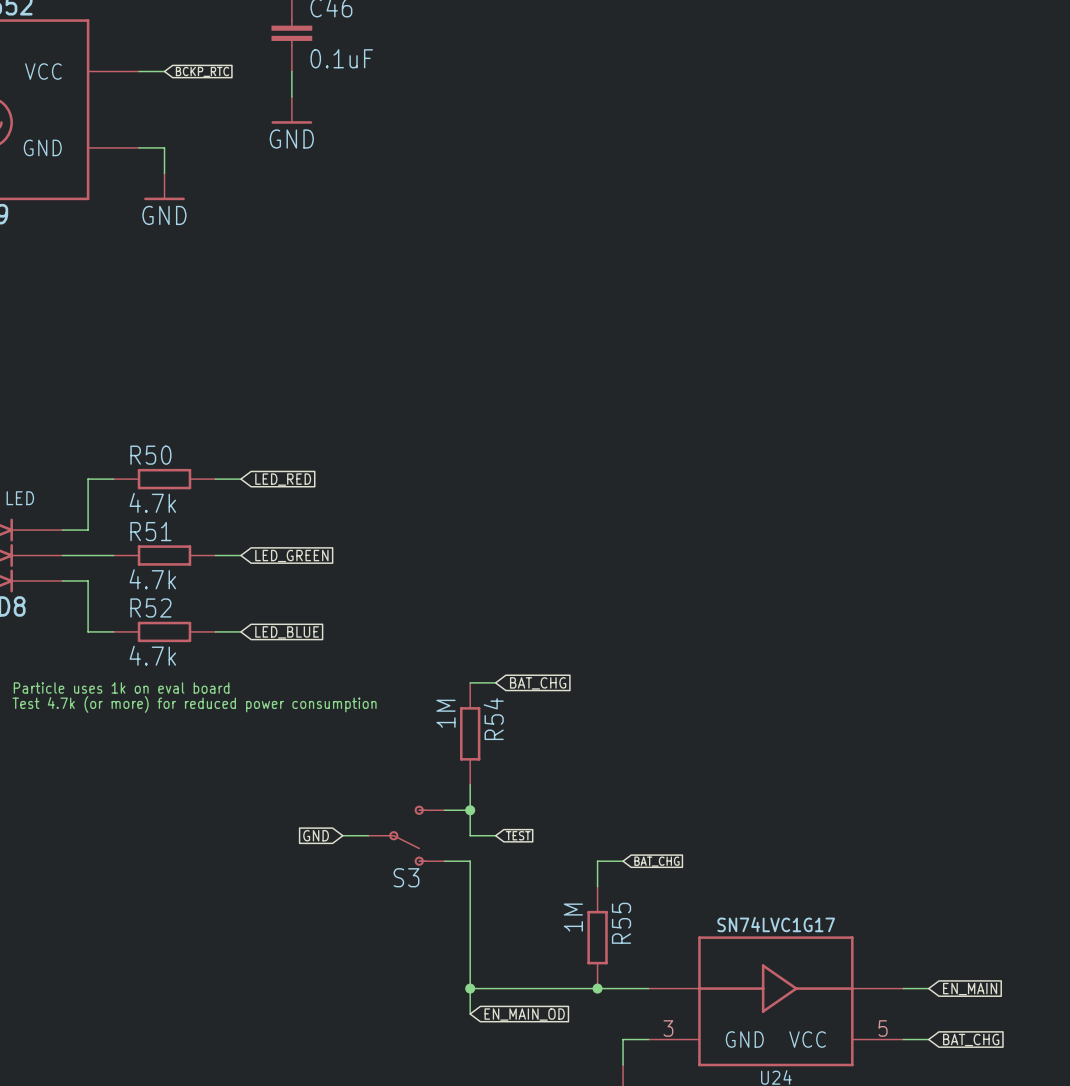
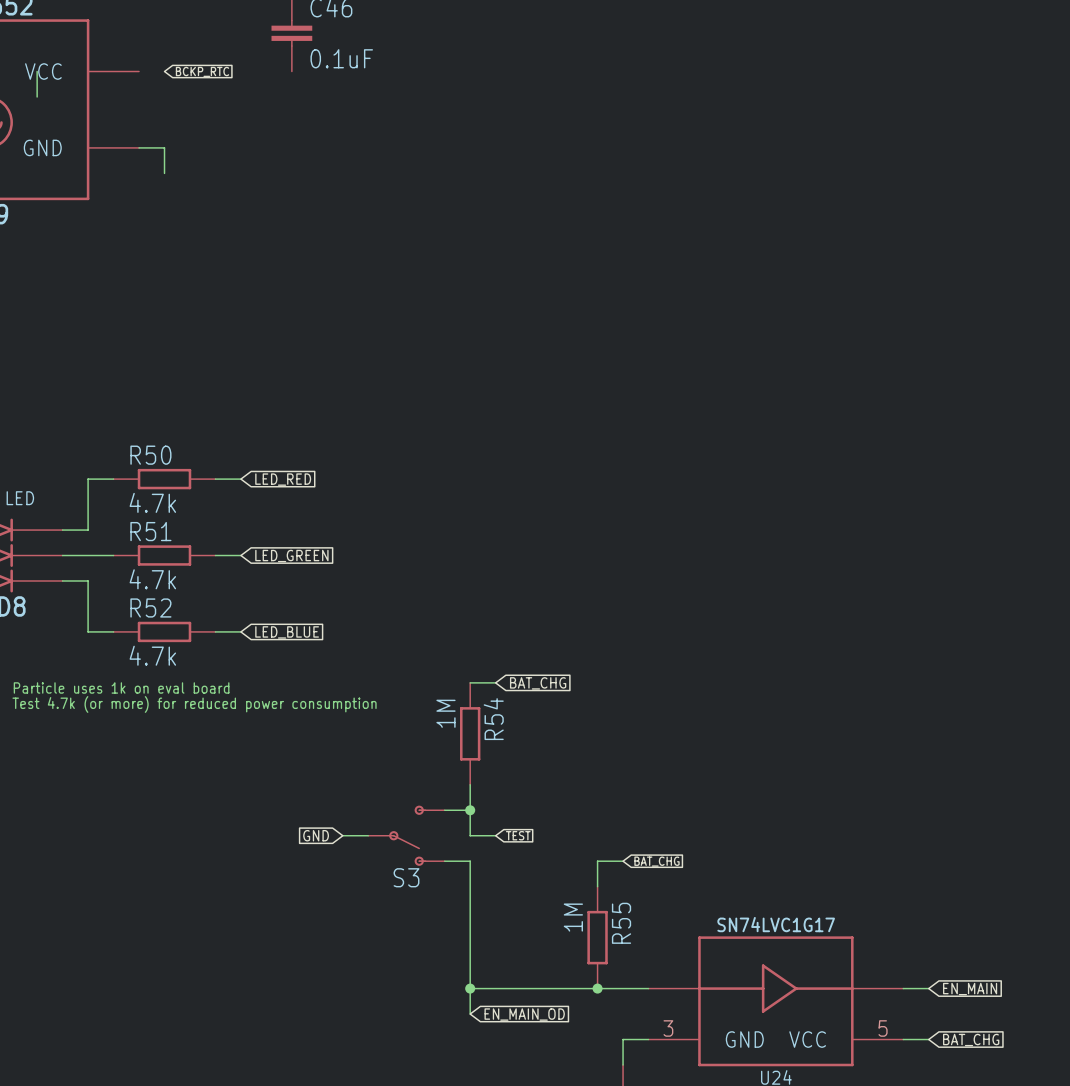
wire: none -> (37, 71) (37, 96)
wire: (139, 71) (164, 71) -> none
wire: (291, 71) (291, 96) -> none
power symbol: GND (291, 110) -> none
power symbol: GND (164, 186) -> none

